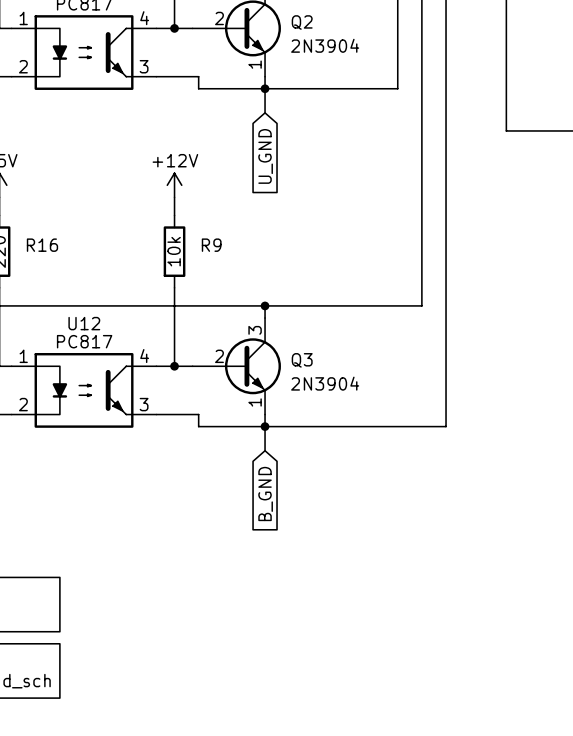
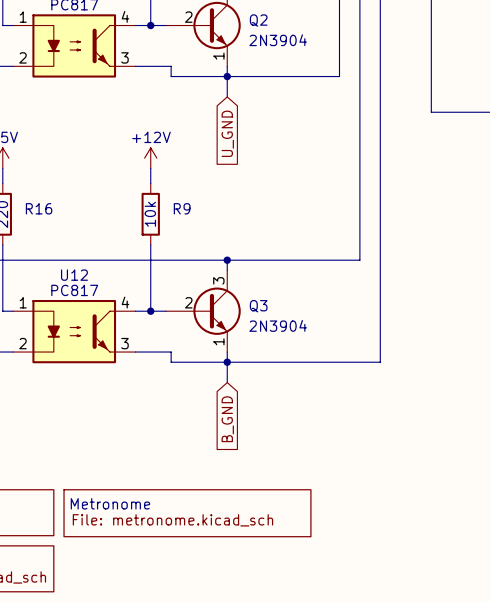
sheet Metronome: none -> File: metronome.kicad_sch (187, 513)

